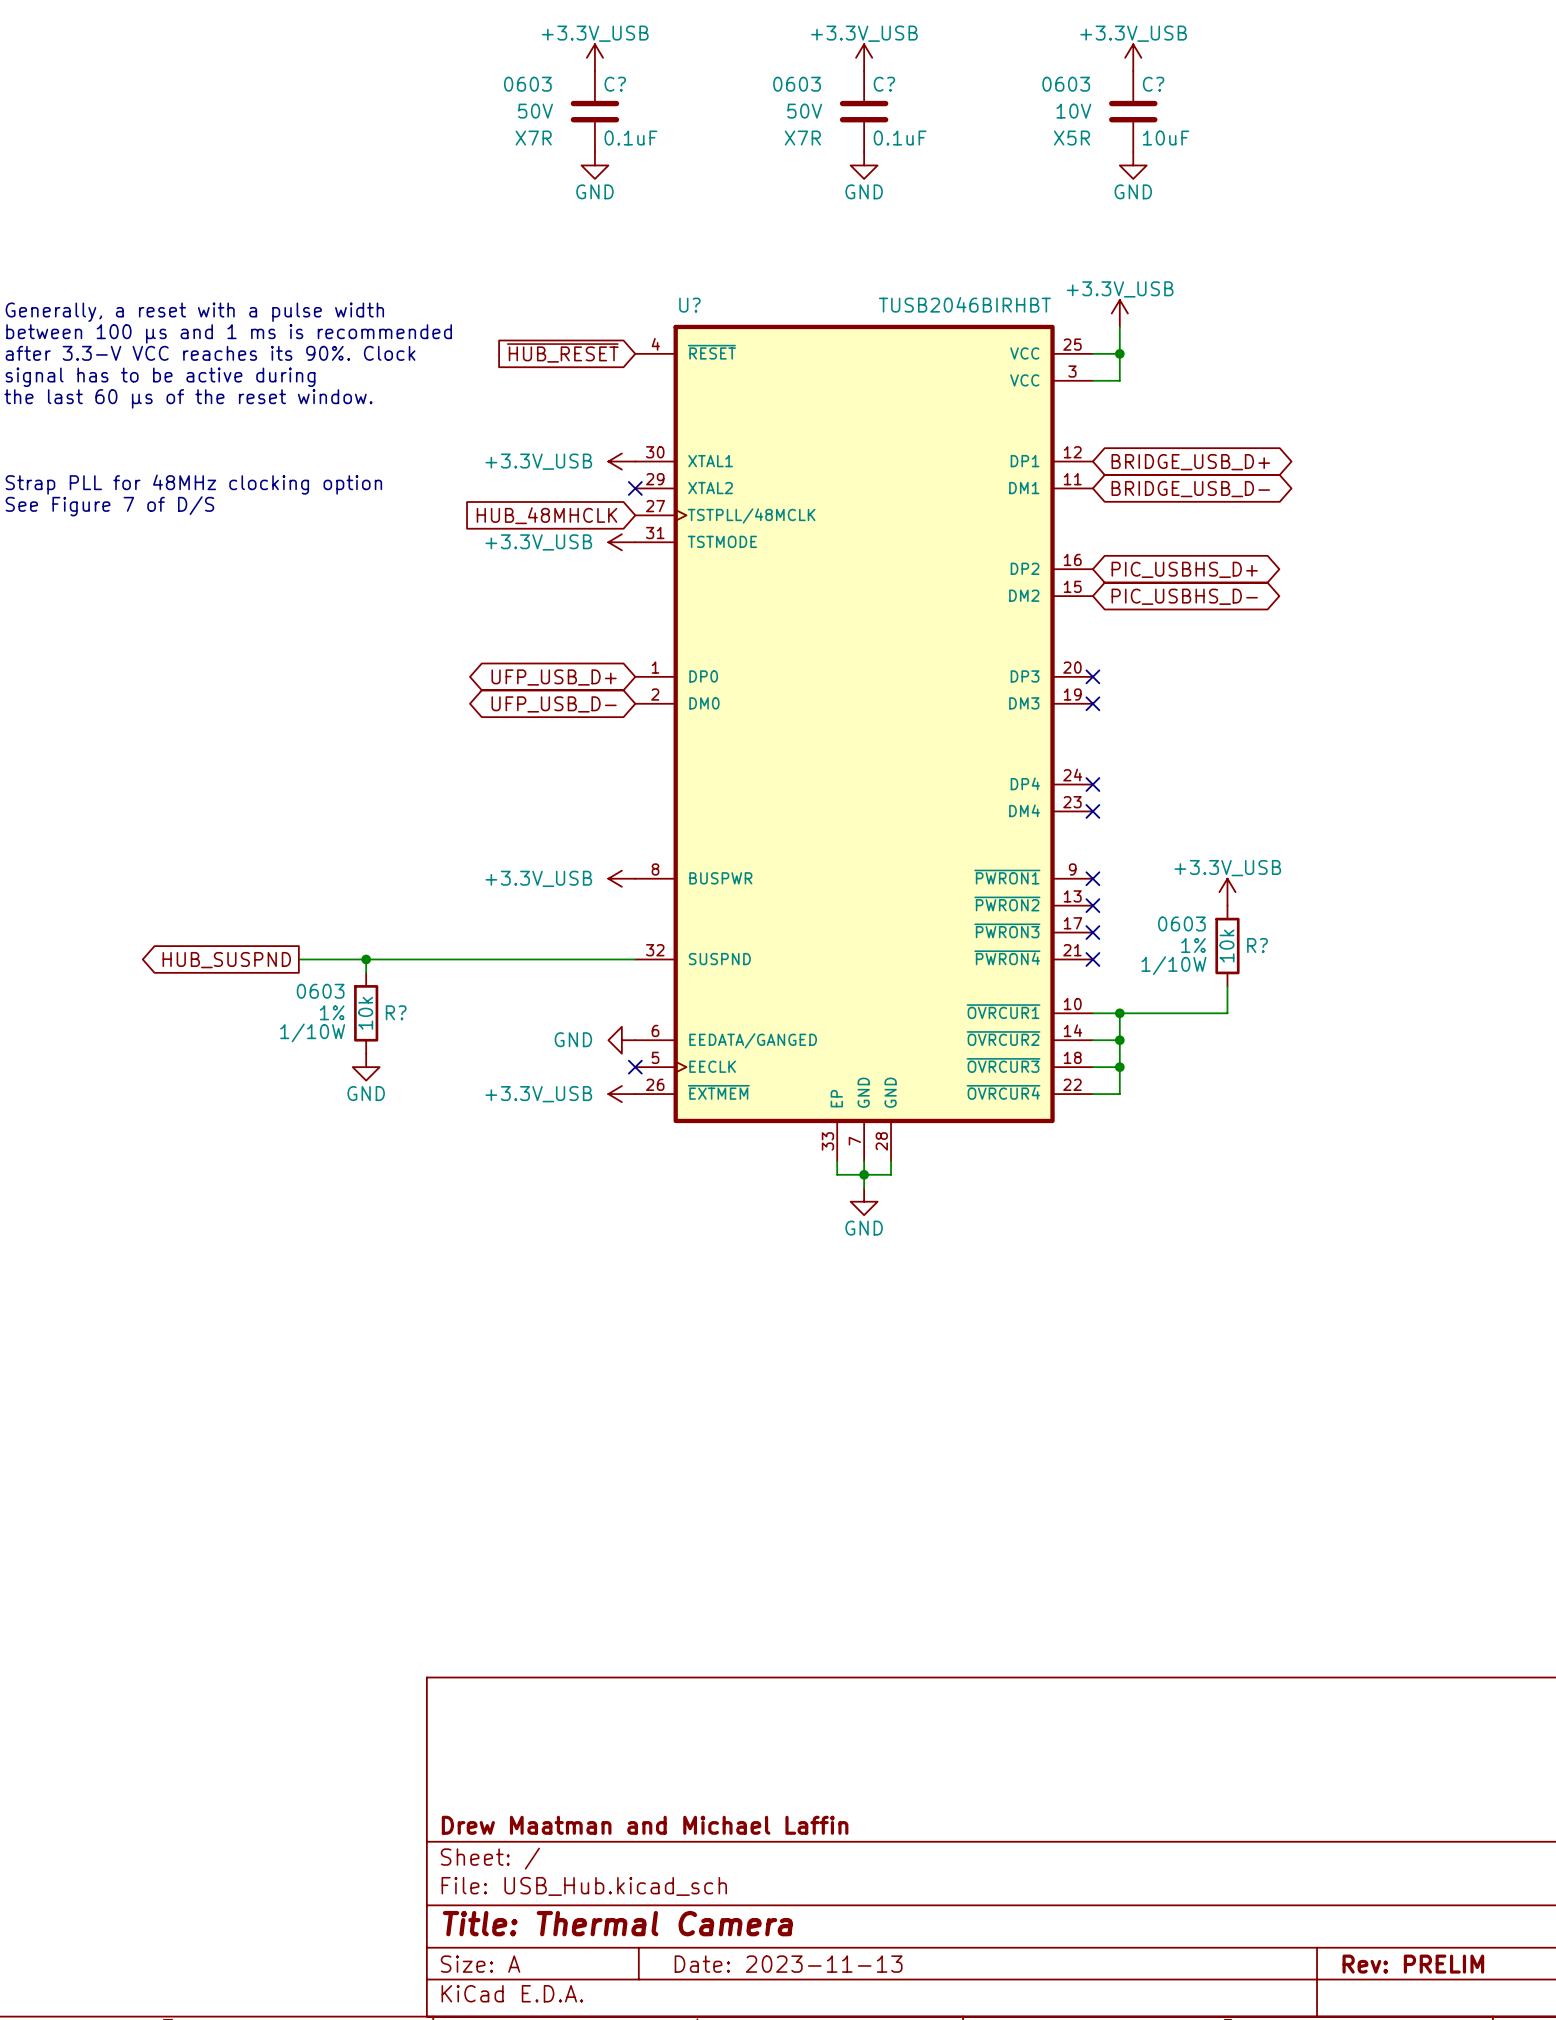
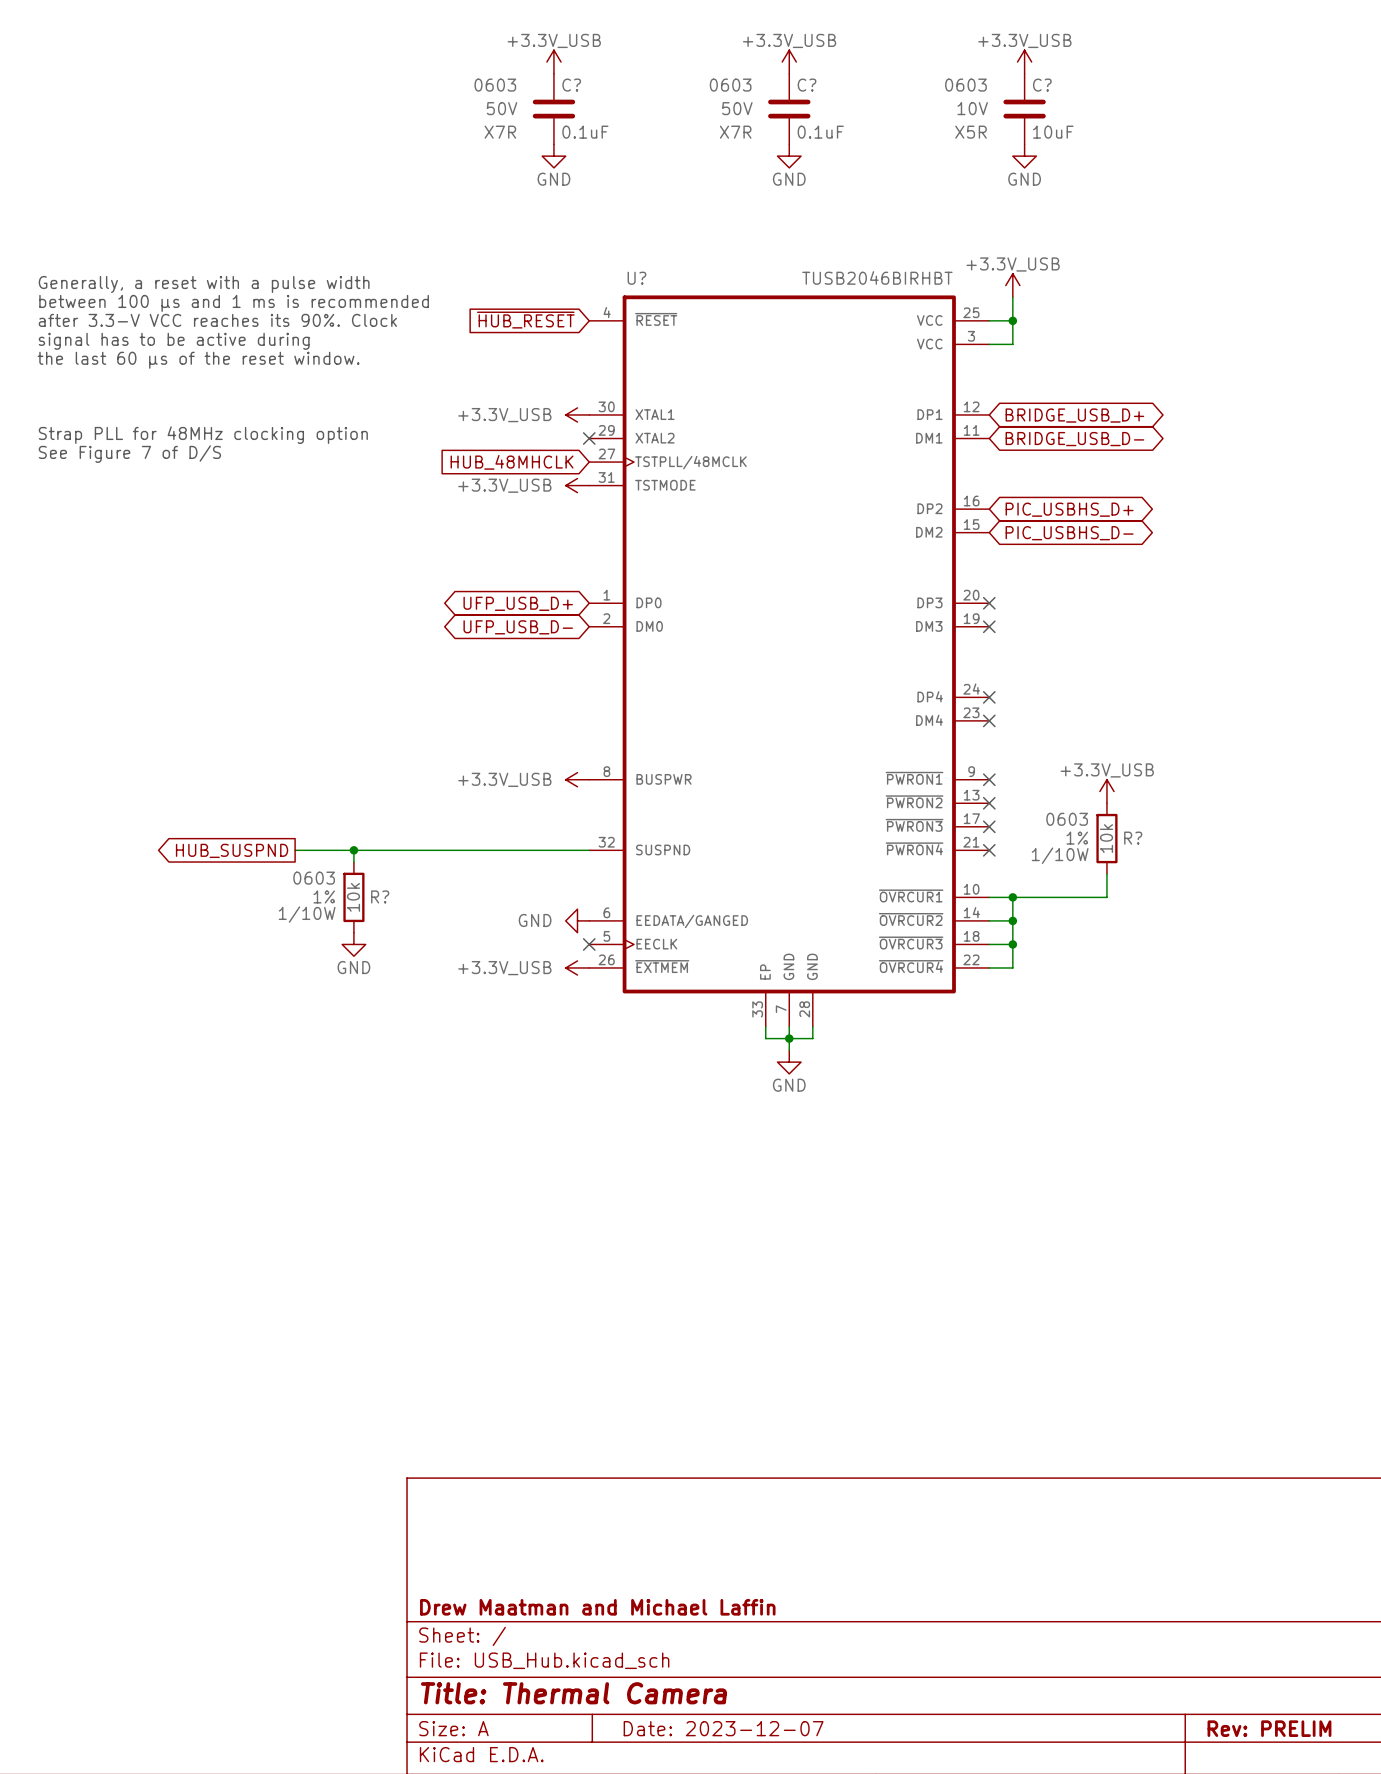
title block: Date: 2023-11-13 (788, 1964) -> Date: 2023-12-07 (723, 1728)

